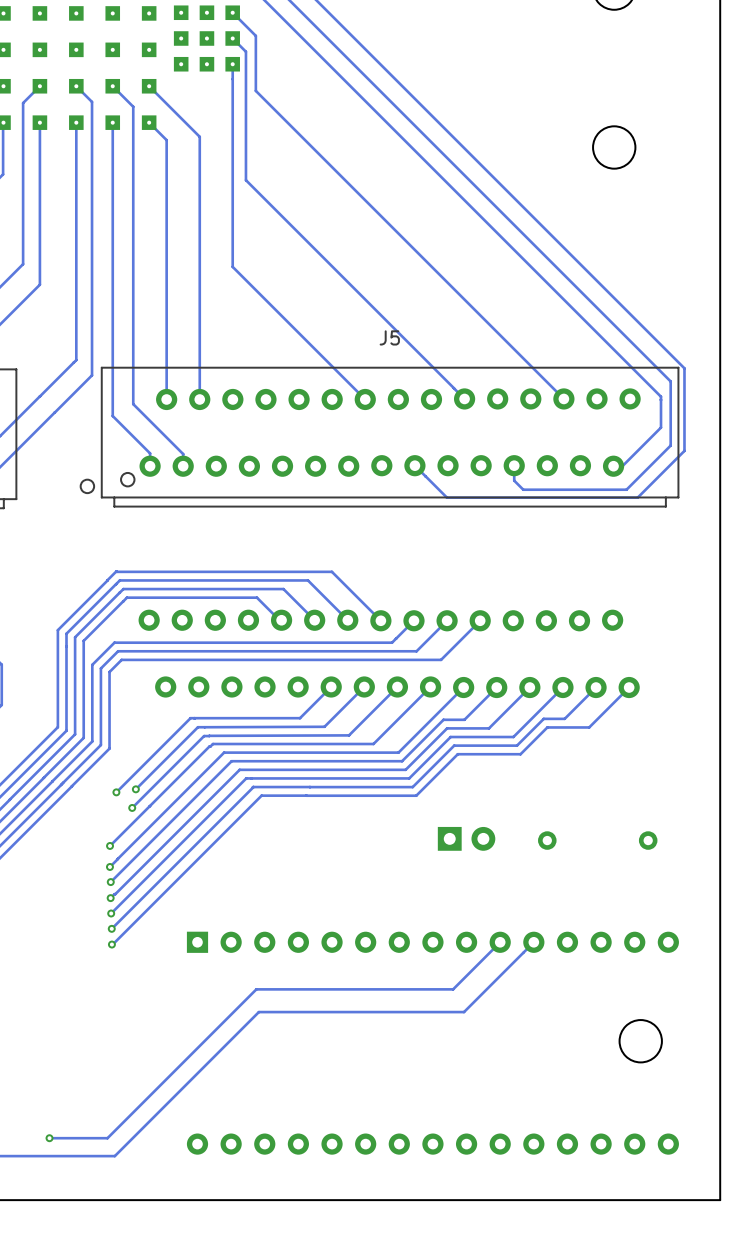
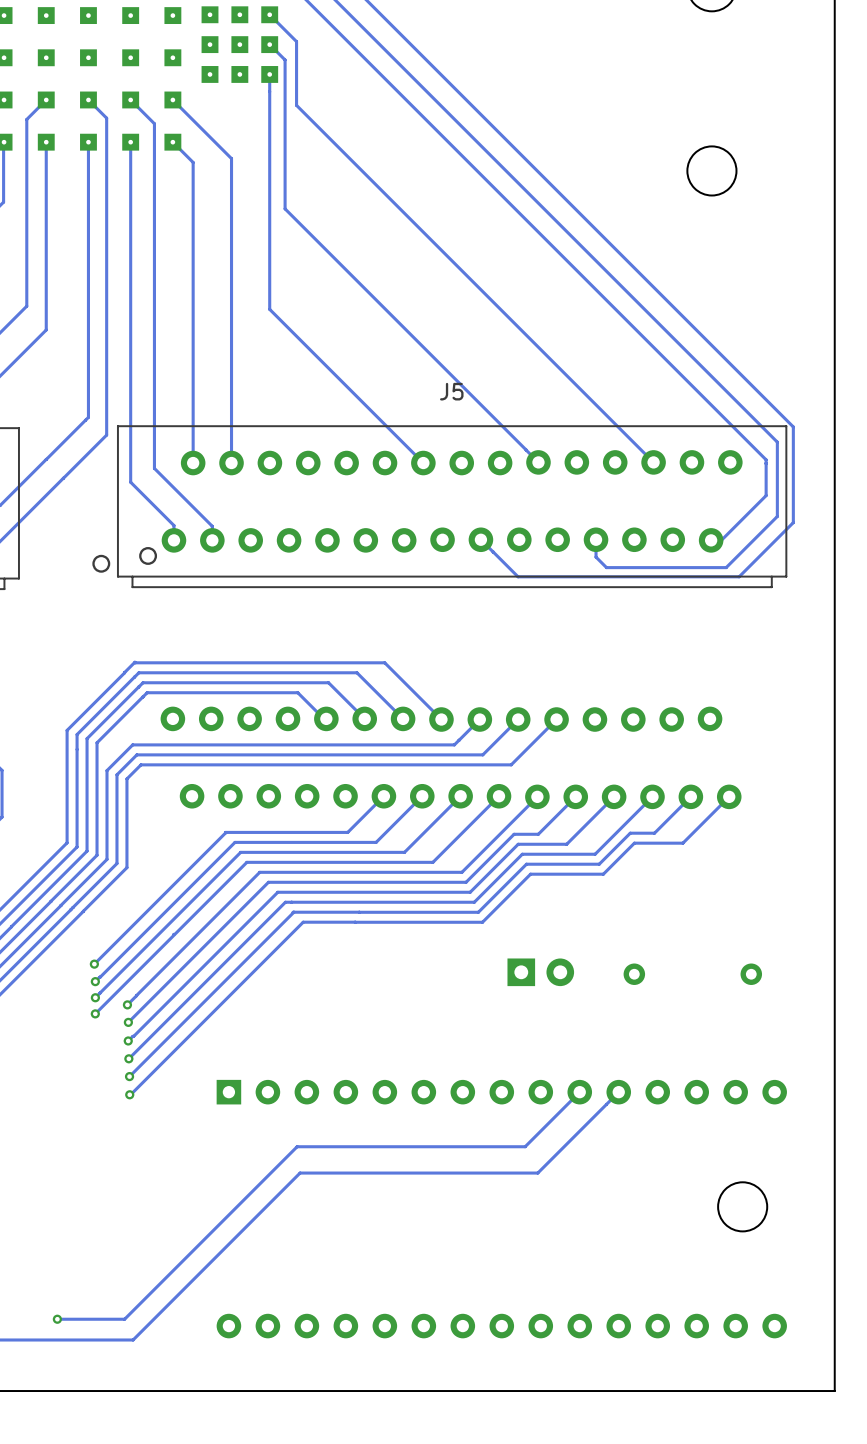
track: (194, 718) (190, 718) (116, 792) -> (225, 832) (94, 964)
track: (324, 726) (197, 727) (135, 789) -> (376, 842) (235, 842) (95, 981)
track: (349, 735) (204, 736) (132, 807) -> (404, 852) (240, 852) (95, 997)
track: (210, 746) (110, 845) -> (243, 865) (95, 1013)
via: (135, 789) -> none
via: (116, 792) -> none
via: (132, 807) -> none
via: none -> (94, 964)
via: (110, 845) -> none
via: none -> (95, 981)
via: none -> (95, 997)
via: none -> (95, 1013)

